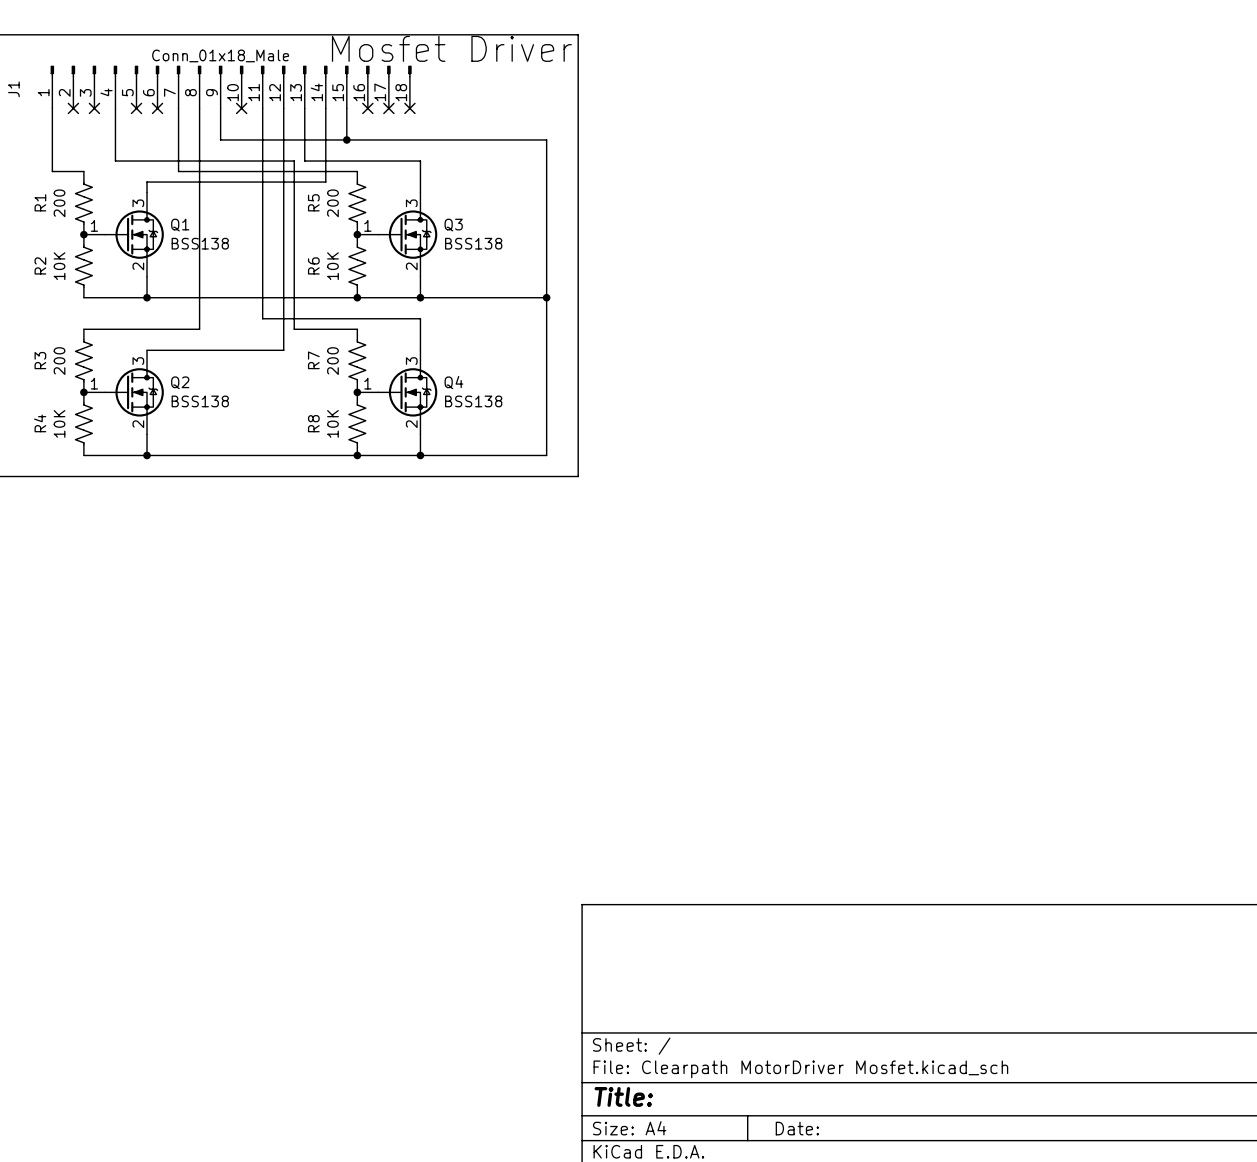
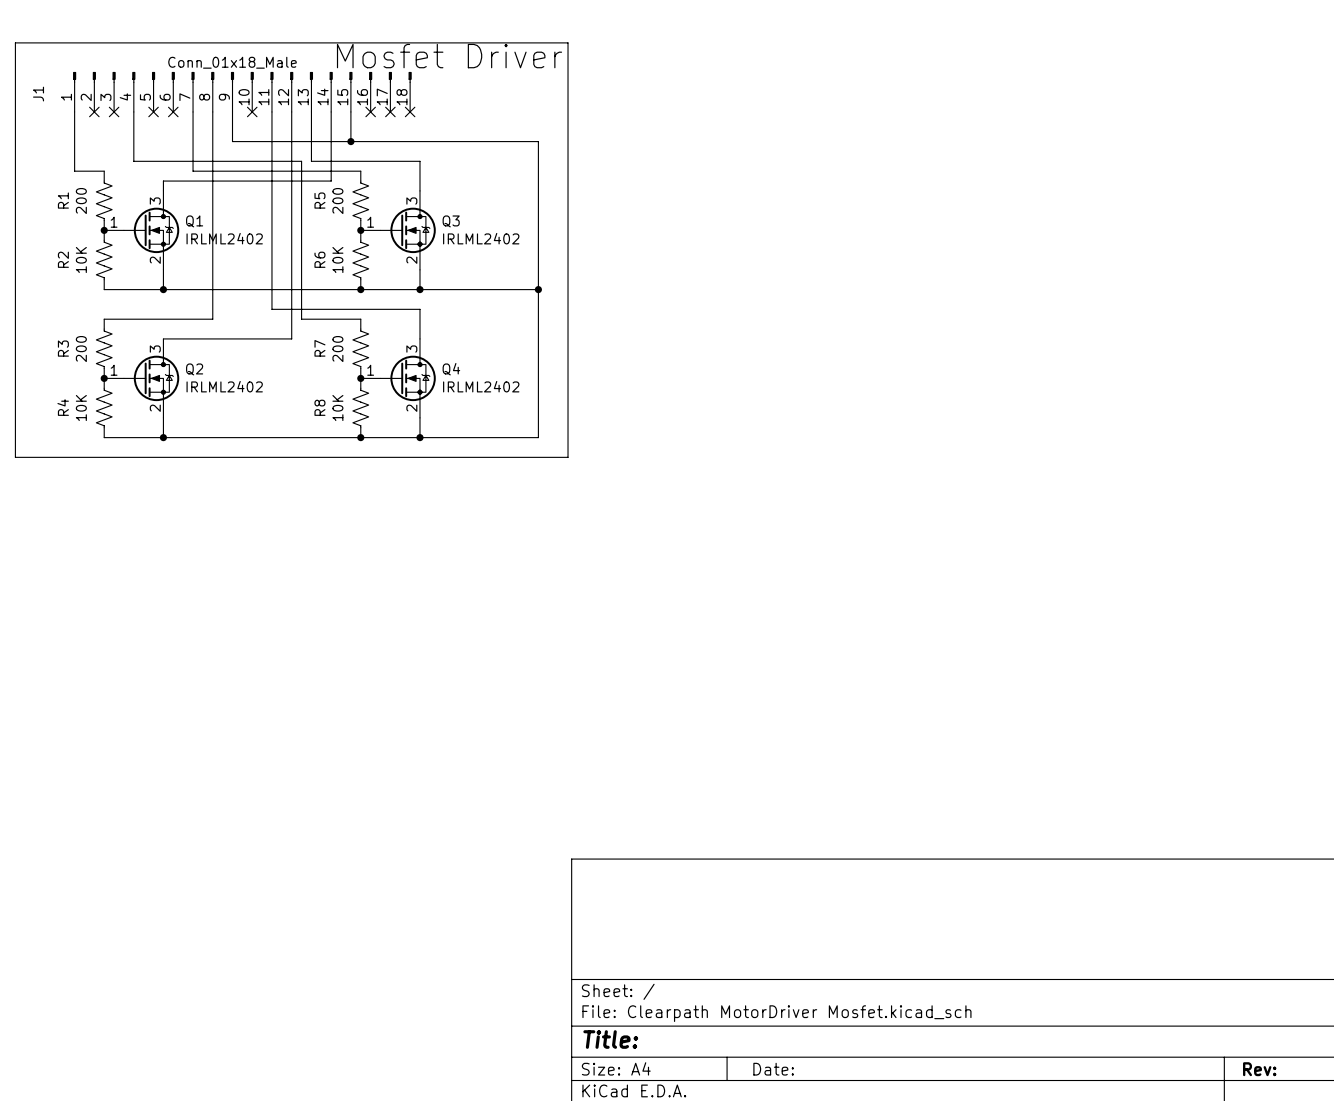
Q1 value: BSS138 (200, 243) -> IRLML2402 (224, 238)
Q3 value: BSS138 (473, 243) -> IRLML2402 (481, 238)
Q2 value: BSS138 (200, 401) -> IRLML2402 (224, 386)
Q4 value: BSS138 (473, 401) -> IRLML2402 (481, 386)

